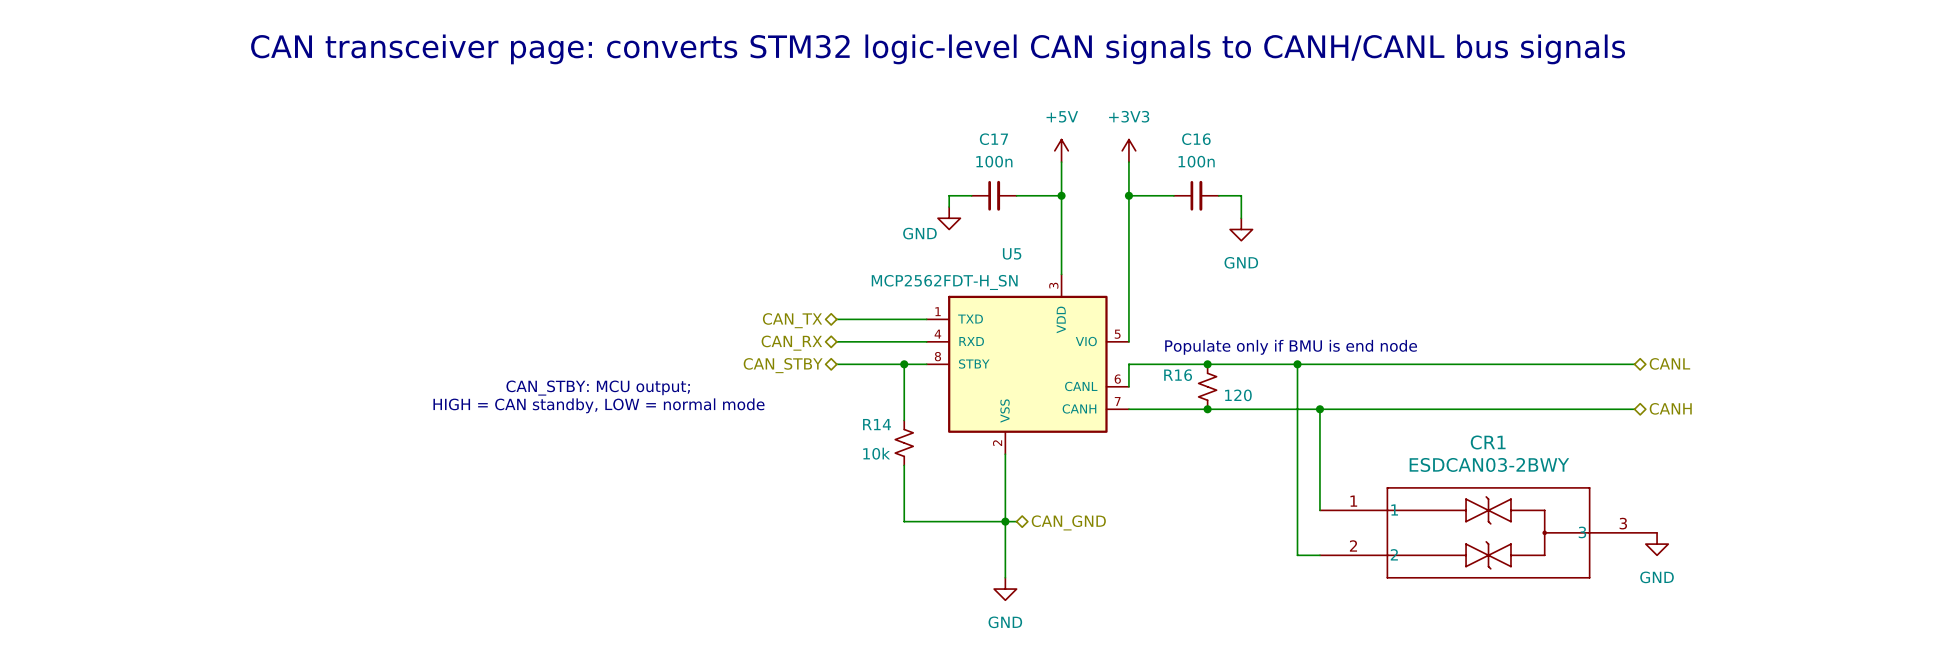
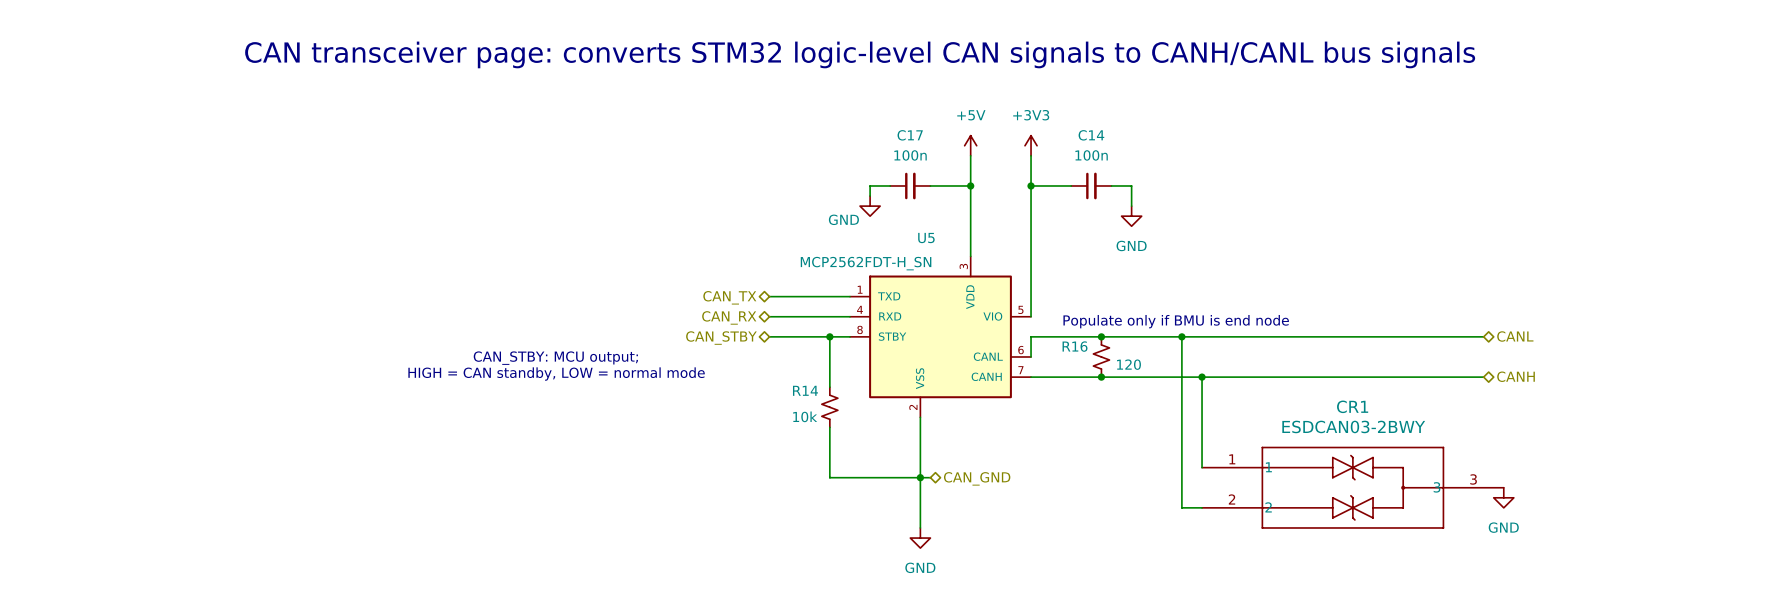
C16 name: C16 (1196, 139) -> C14 (1091, 135)

